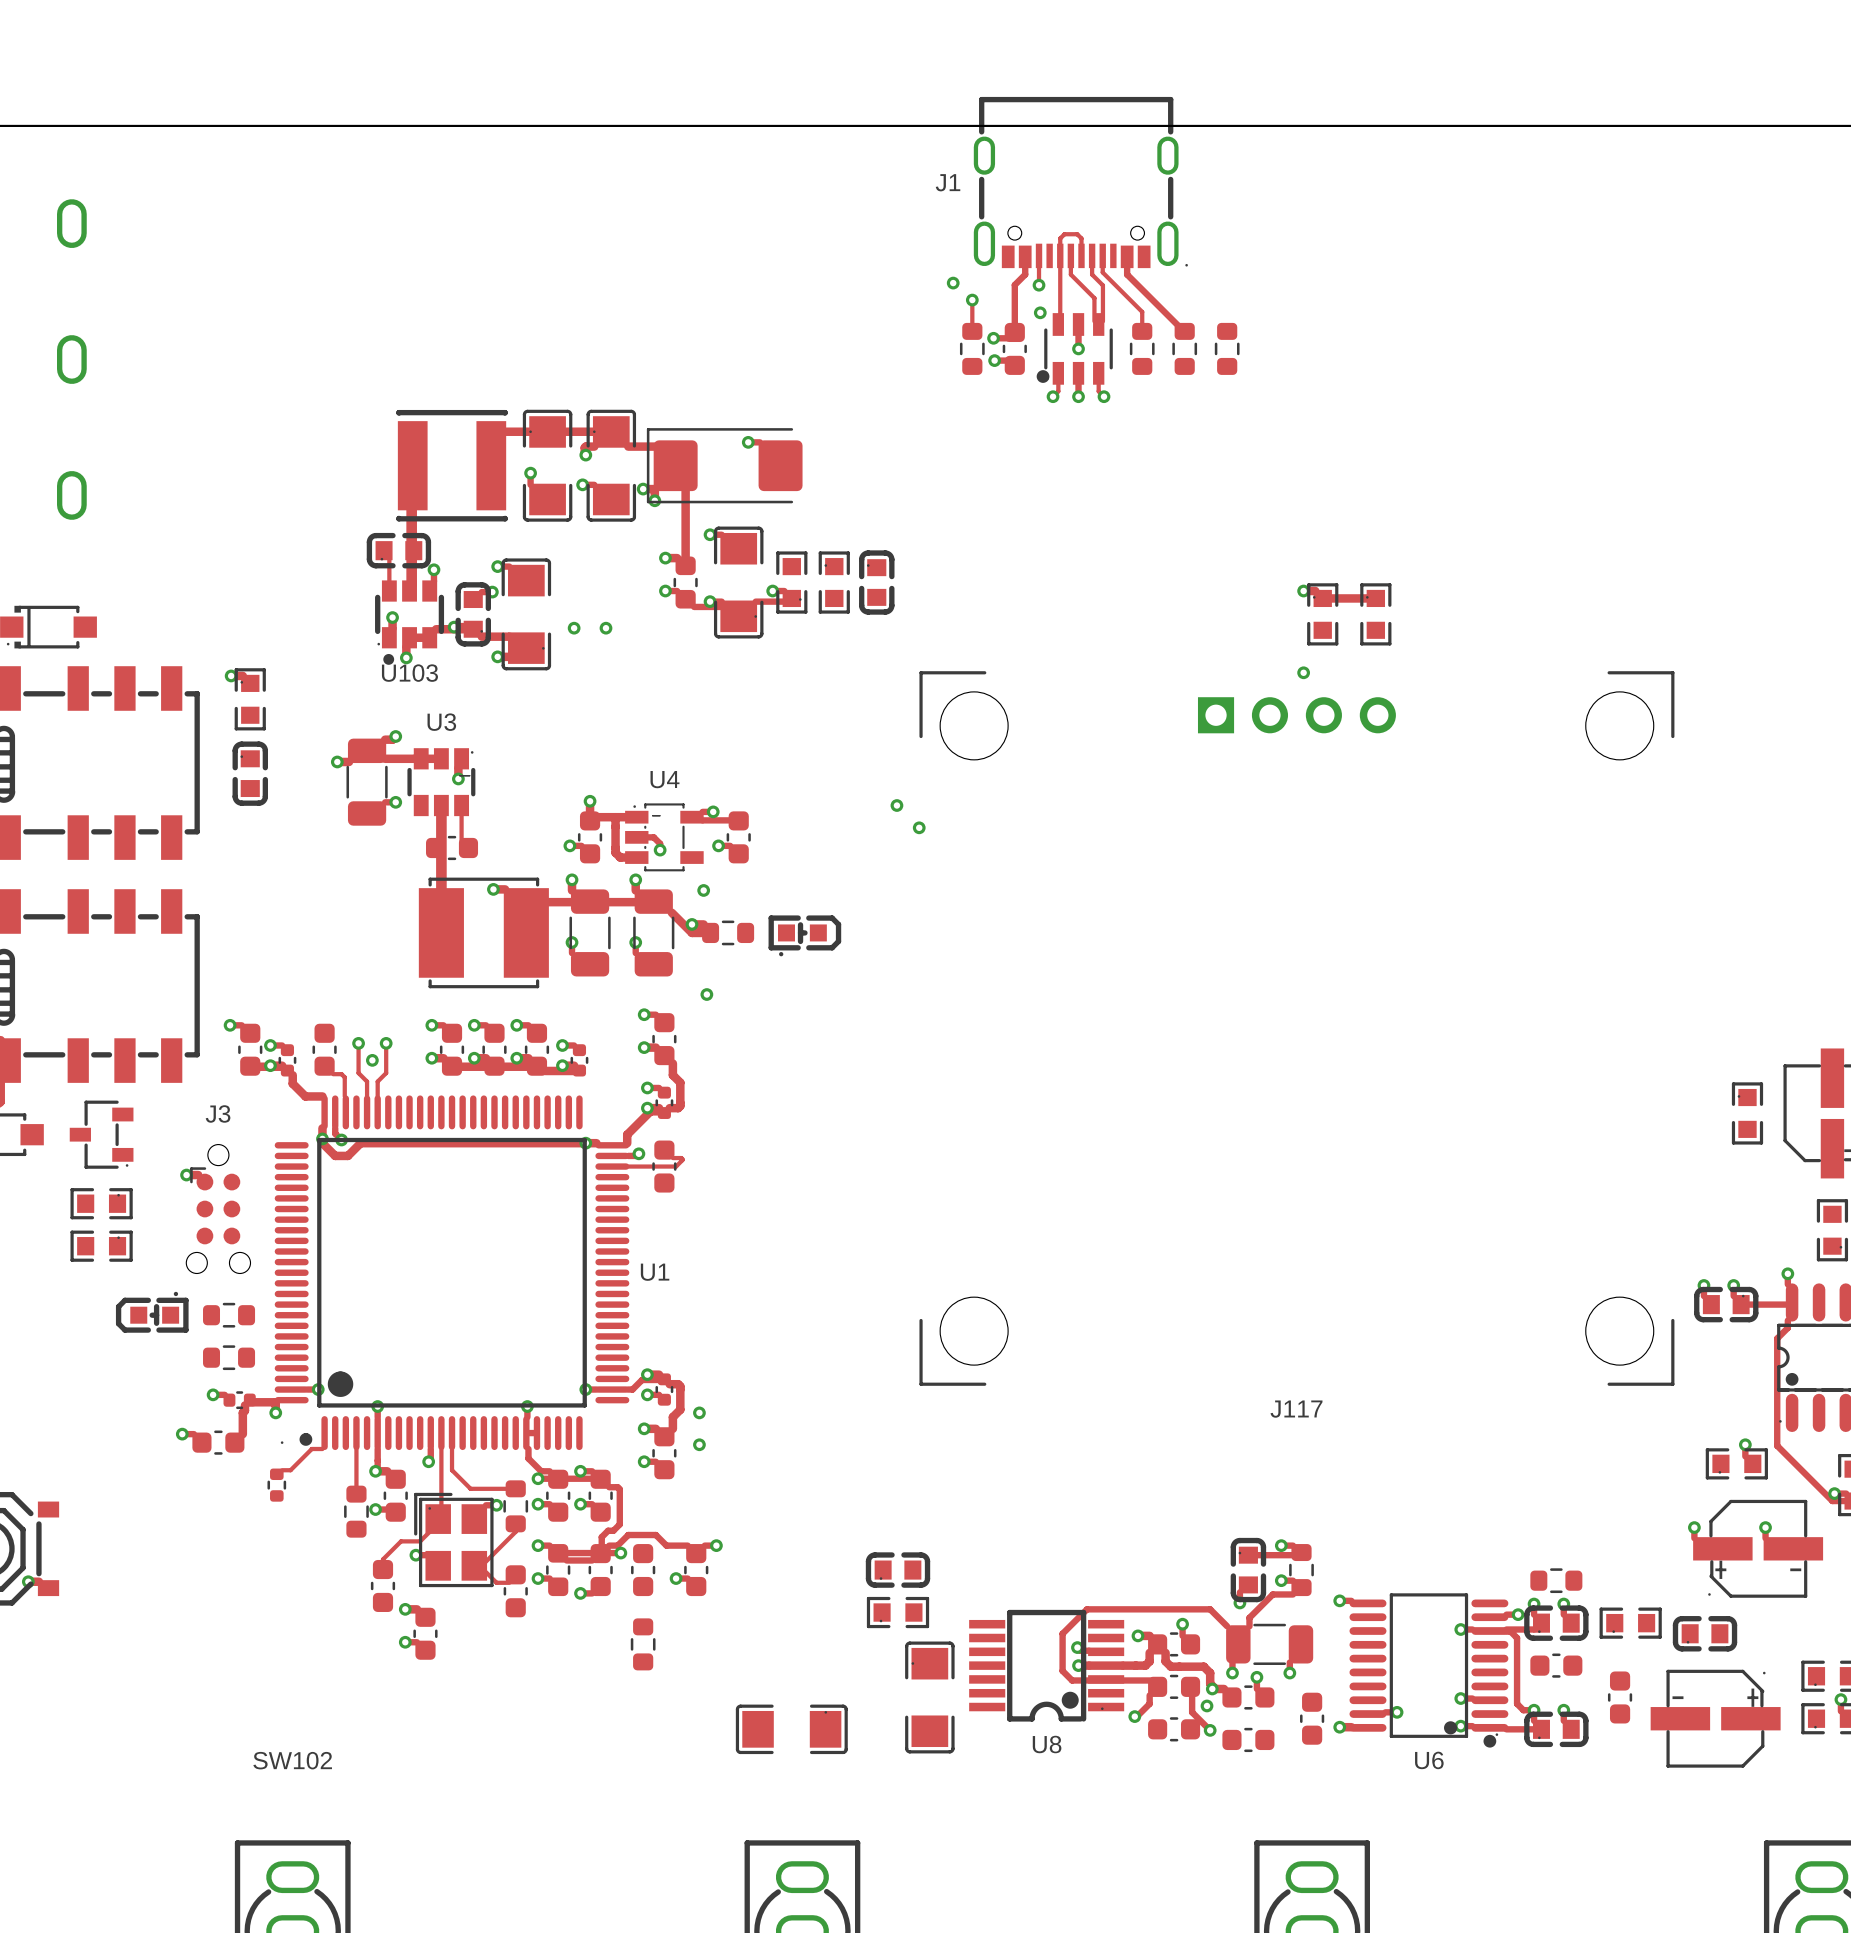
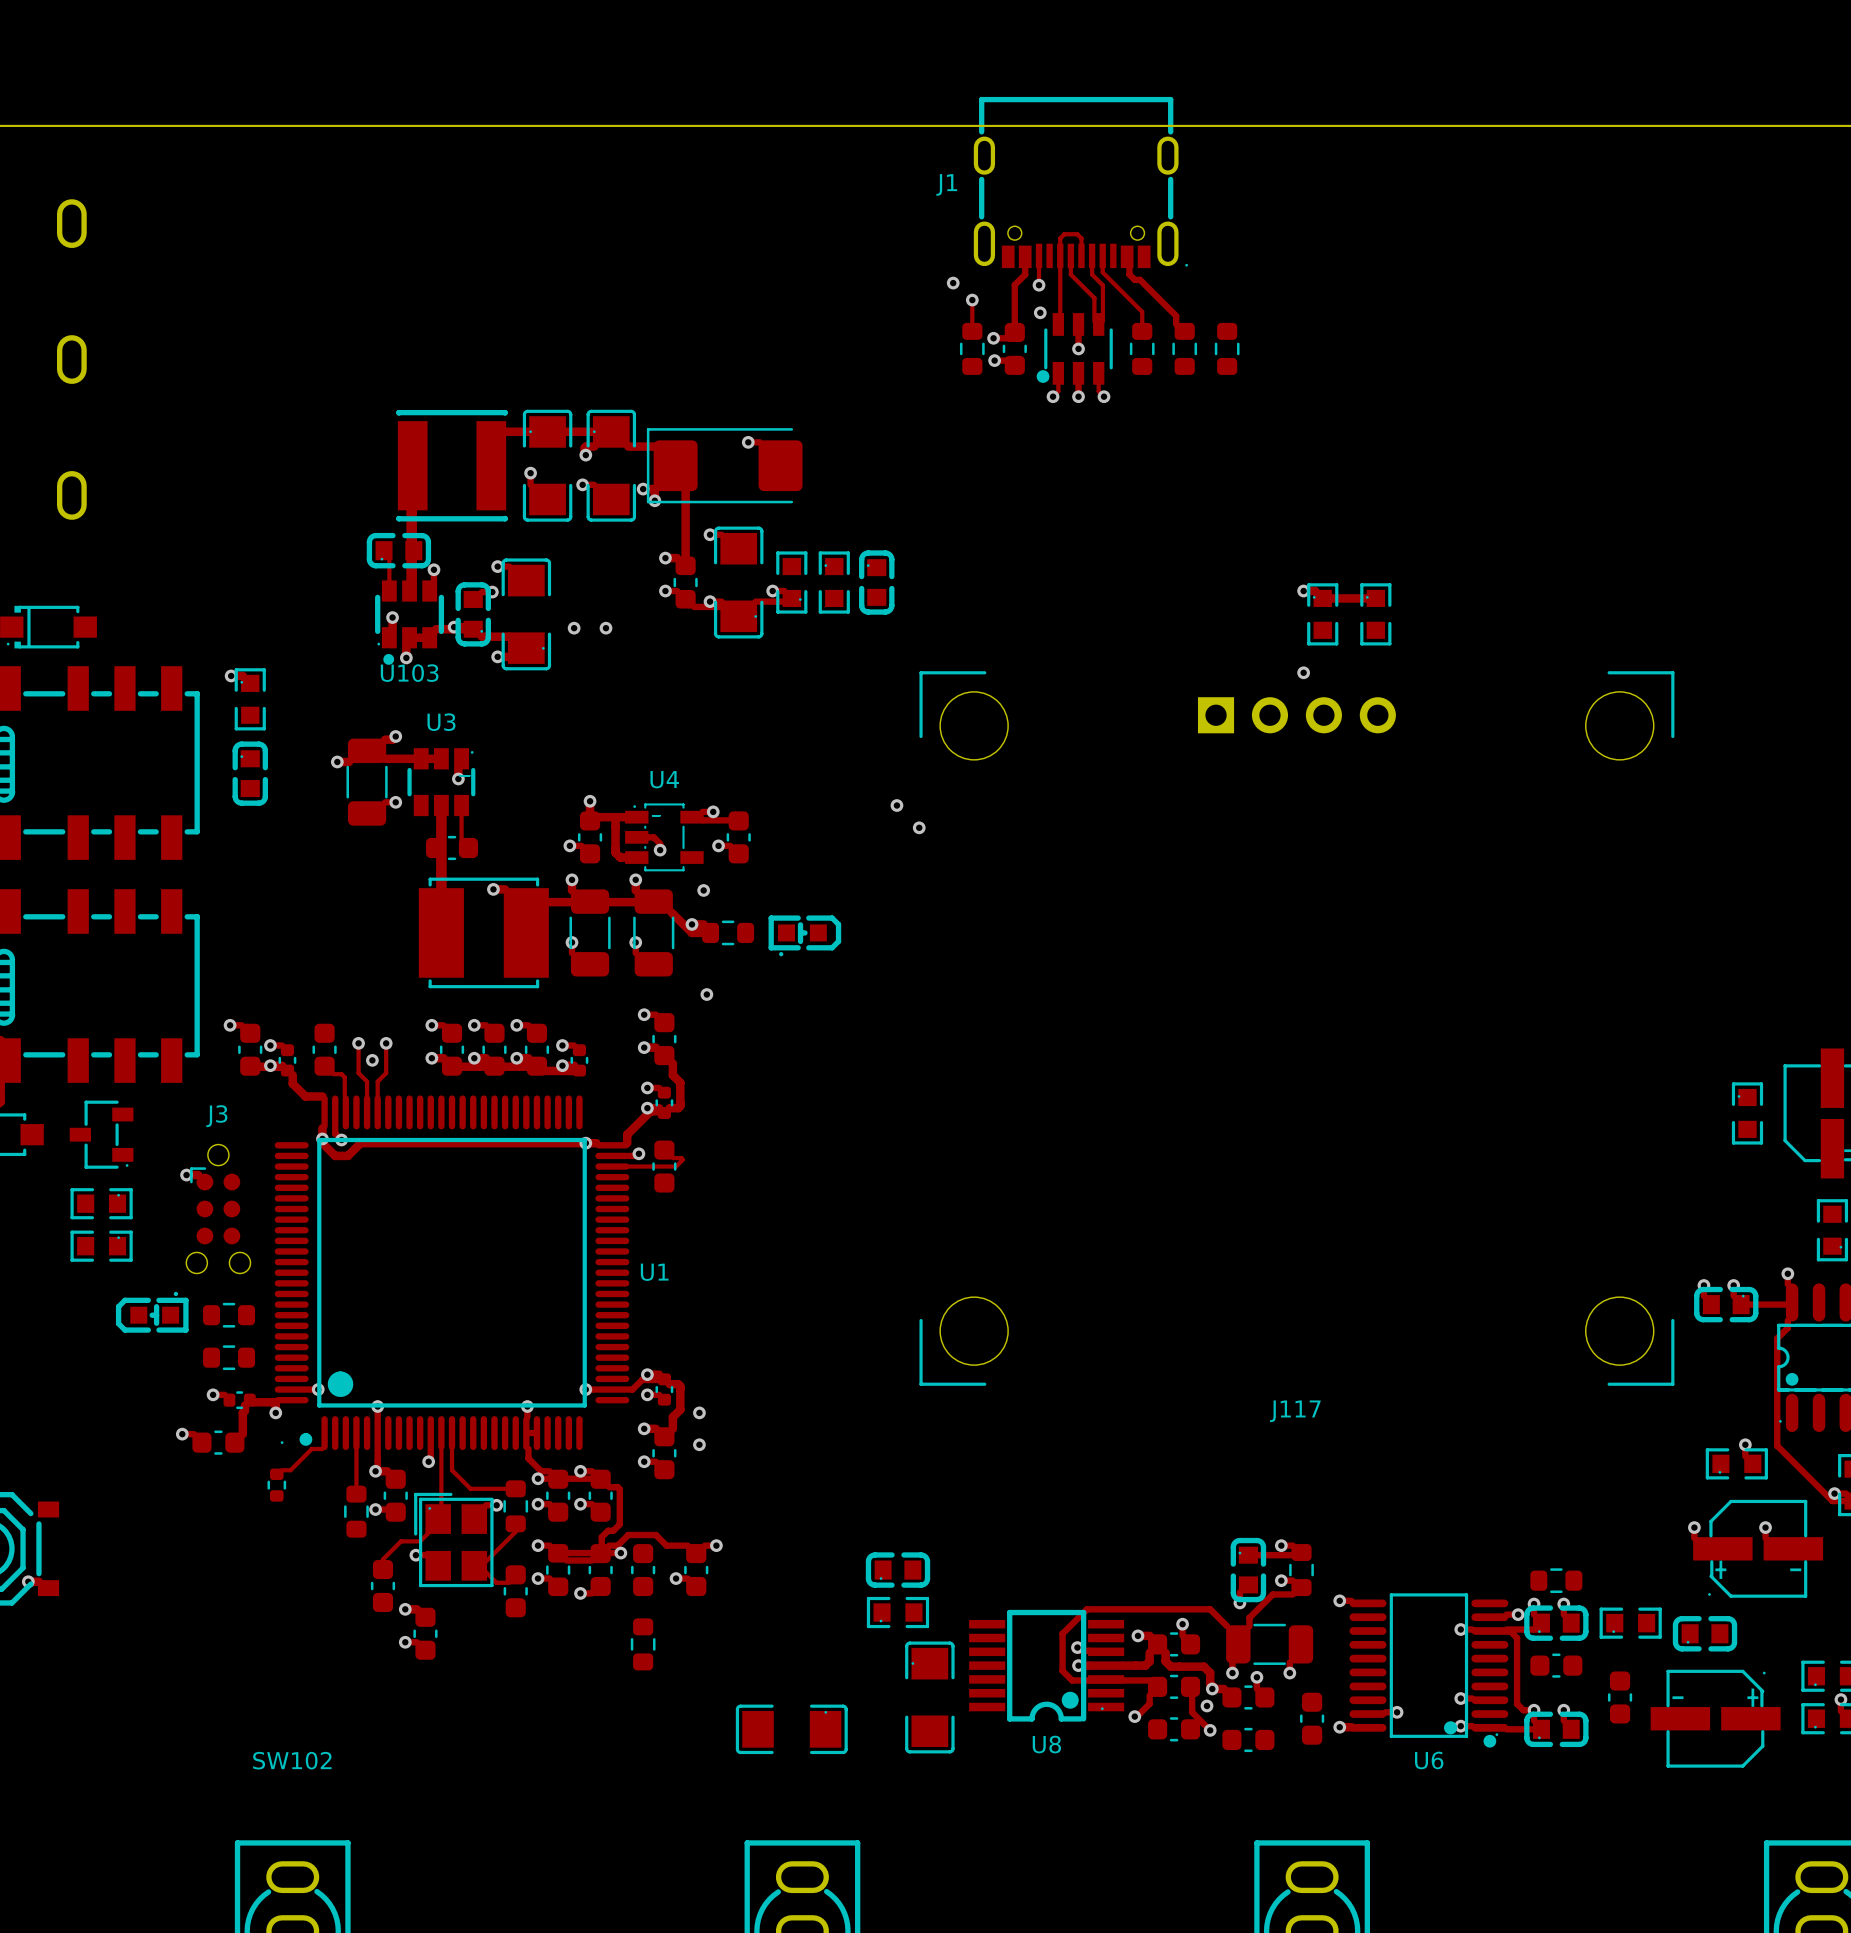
track: (1127, 255) (1127, 274) (1184, 332) -> none
track: none -> (1129, 266) (1129, 274) (1134, 279) (1140, 279) (1176, 315) (1176, 324)

